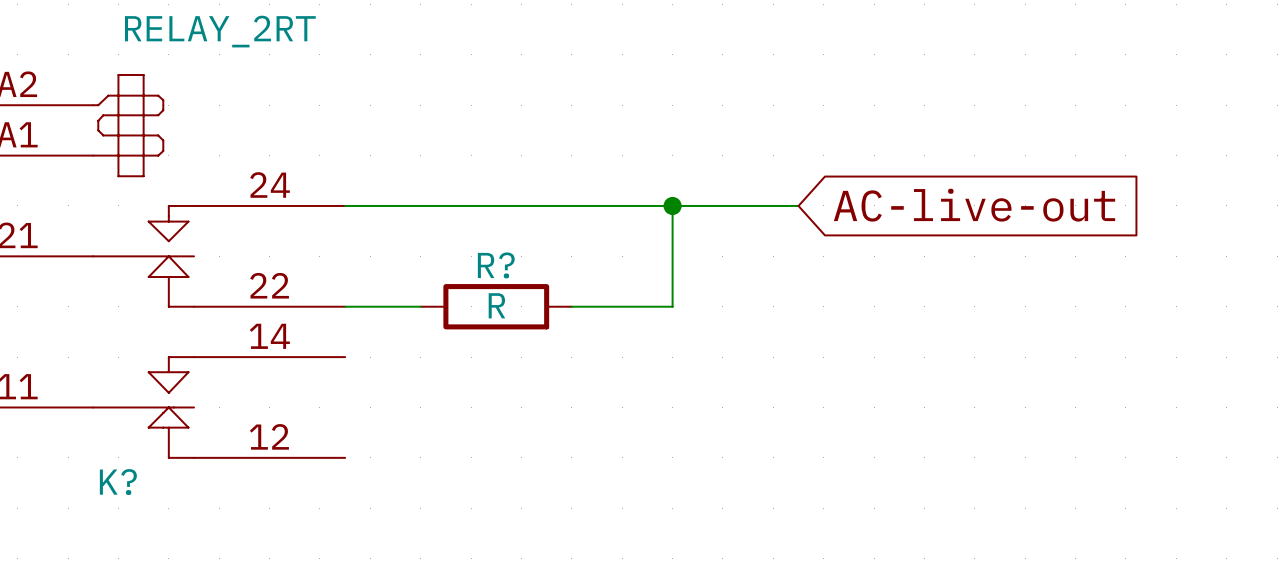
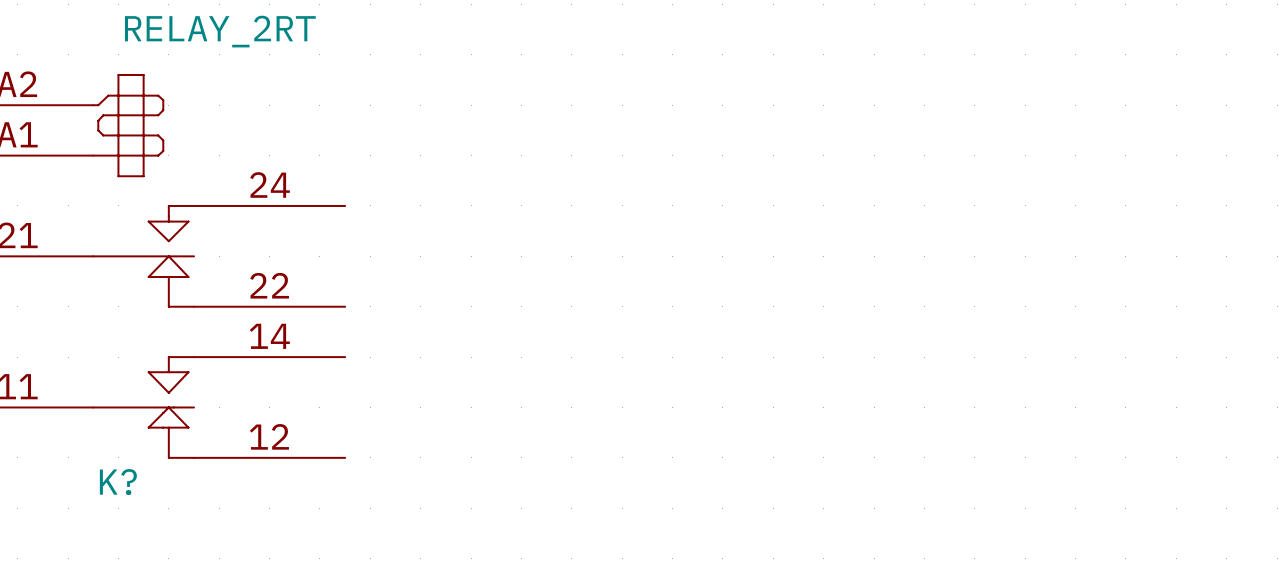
wire: (345, 205) (798, 205) -> none
wire: (672, 205) (672, 306) (571, 306) -> none
junction: (672, 205) -> none
global label: AC-live-out (974, 205) -> none
wire: (345, 306) (420, 306) -> none
R?: R (496, 306) -> none

